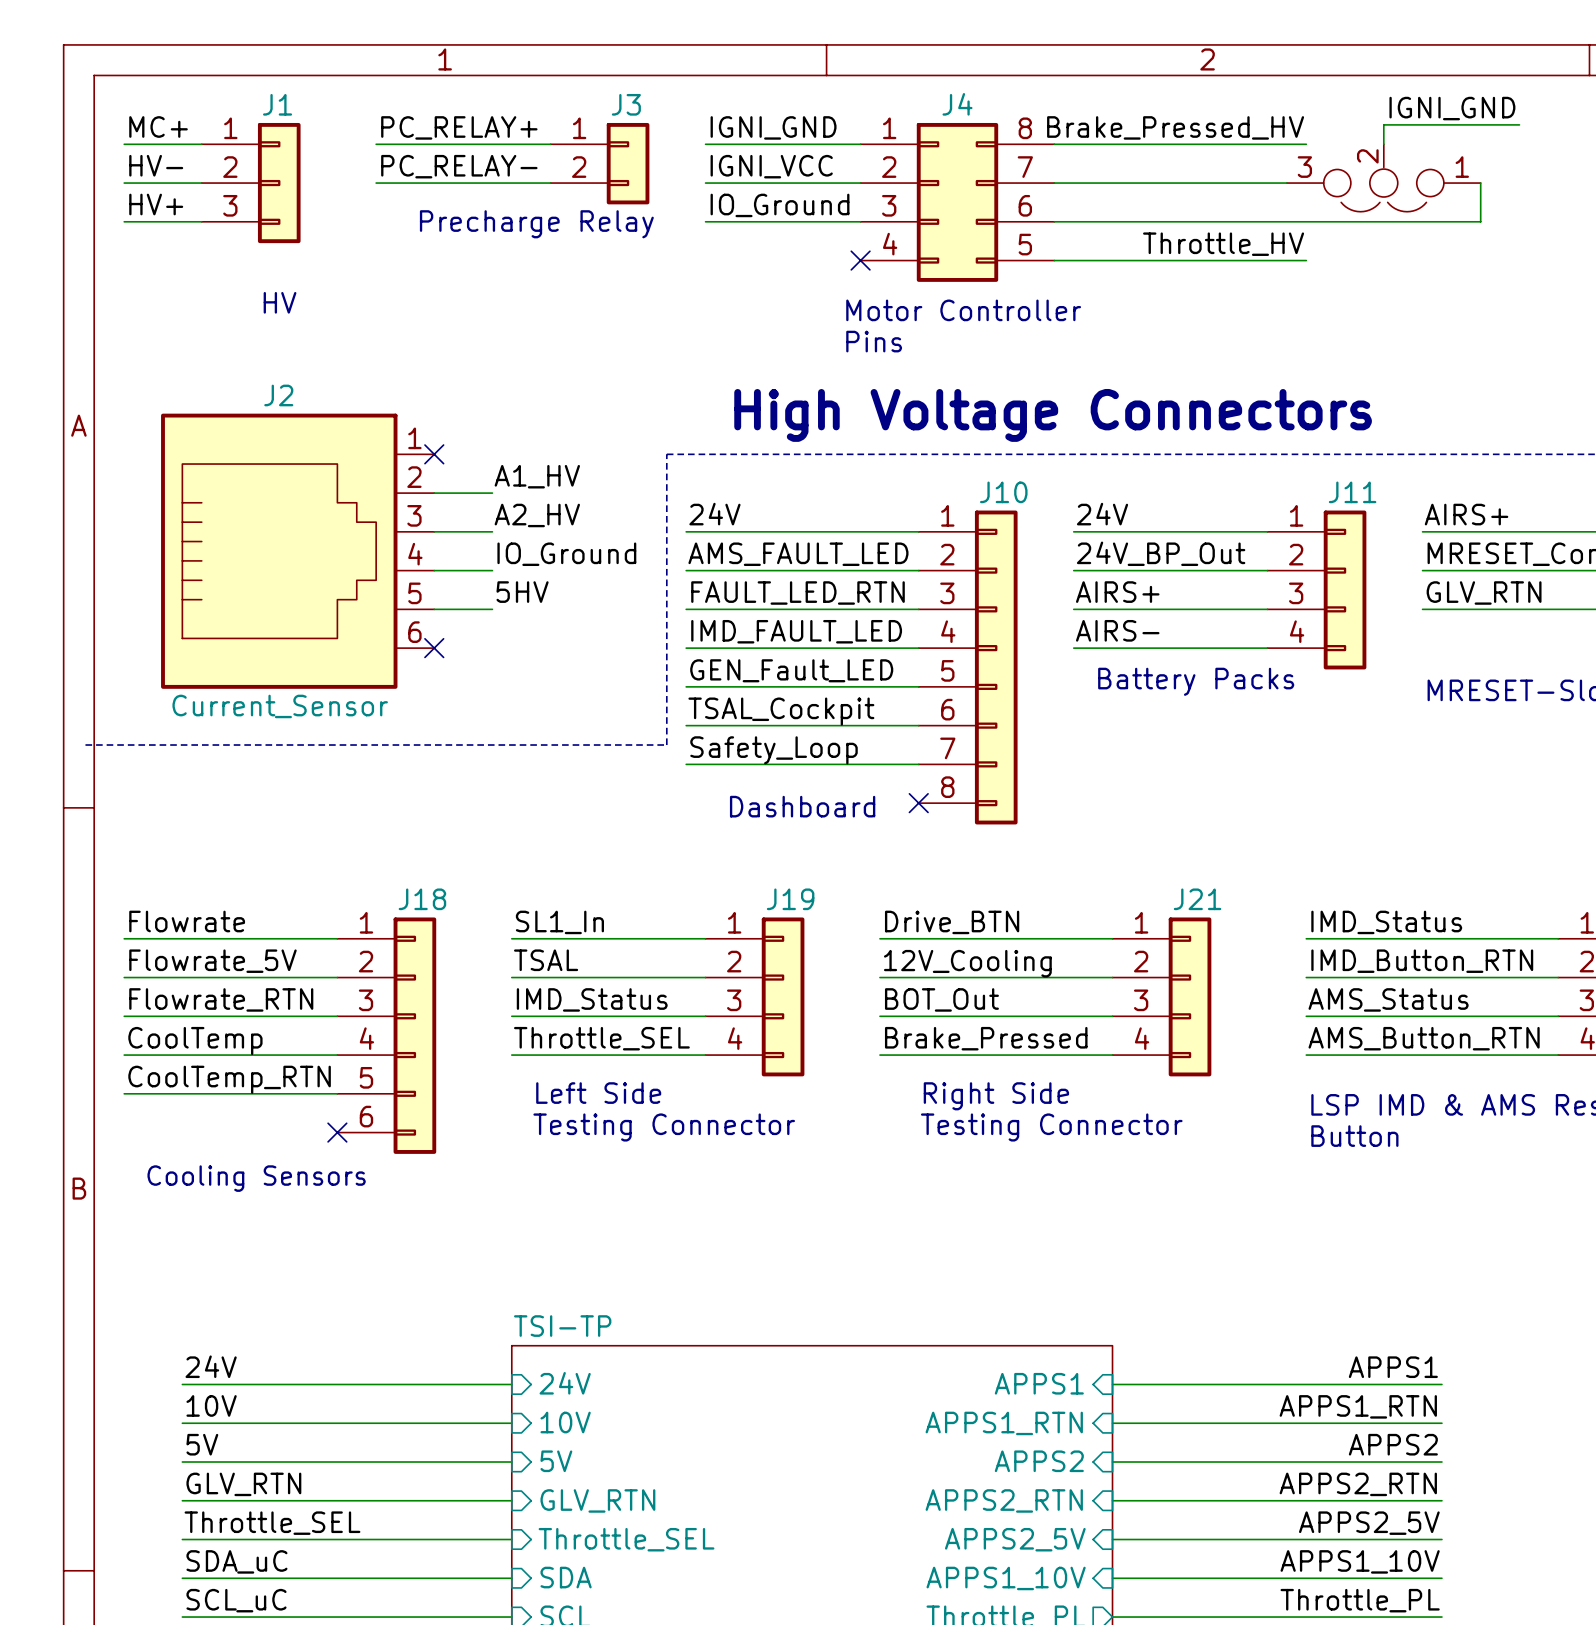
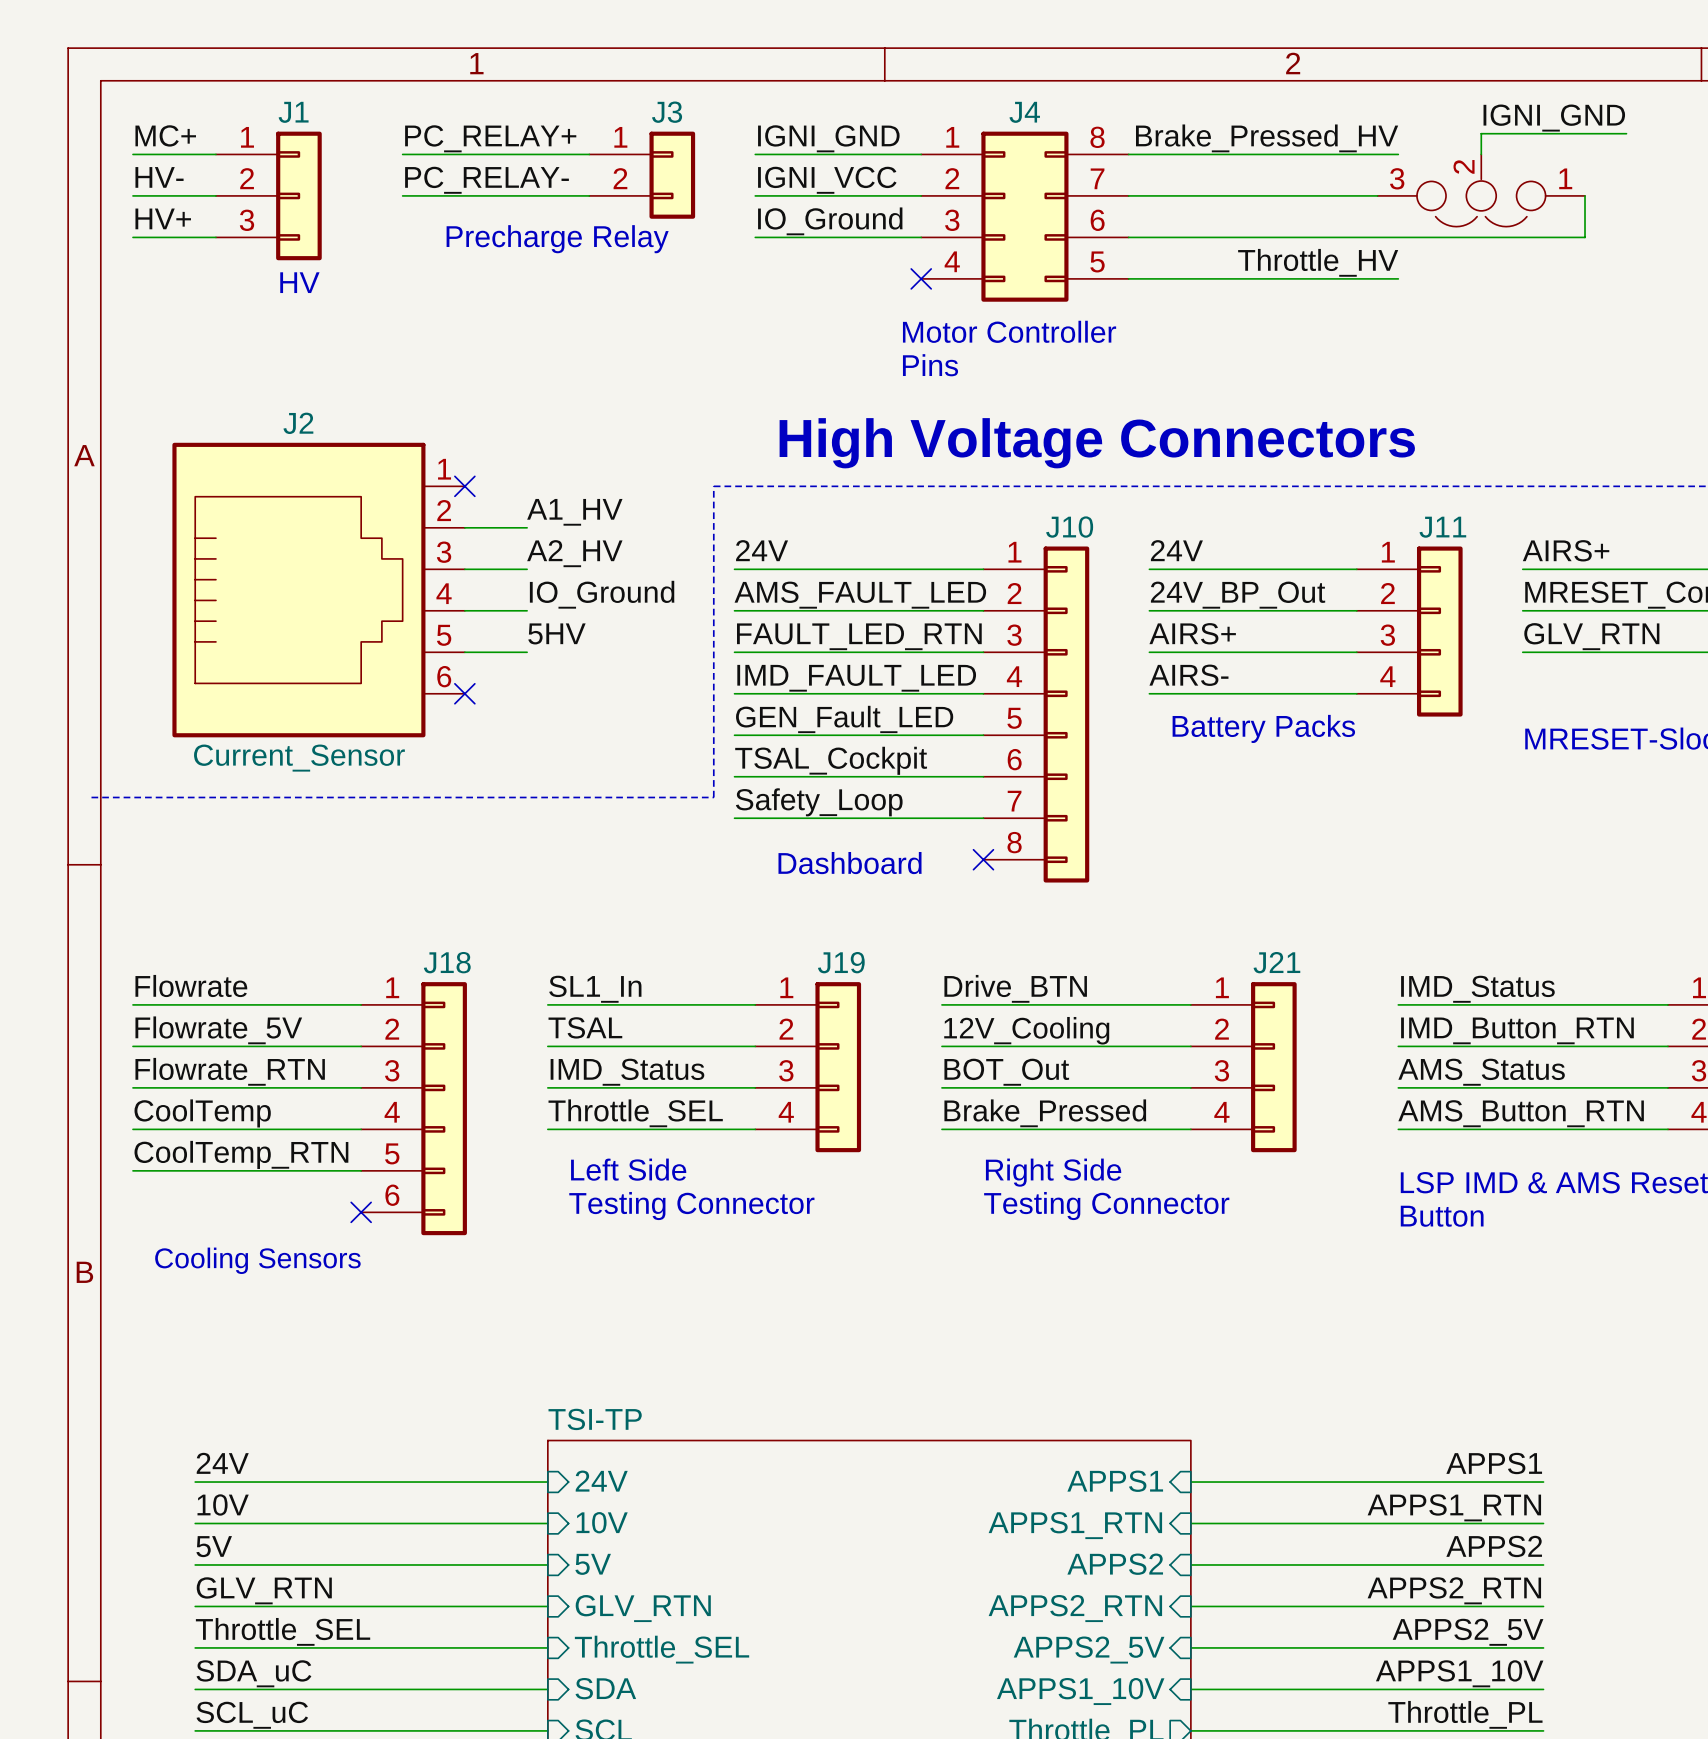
text position: HV (280, 302) -> HV (299, 282)

